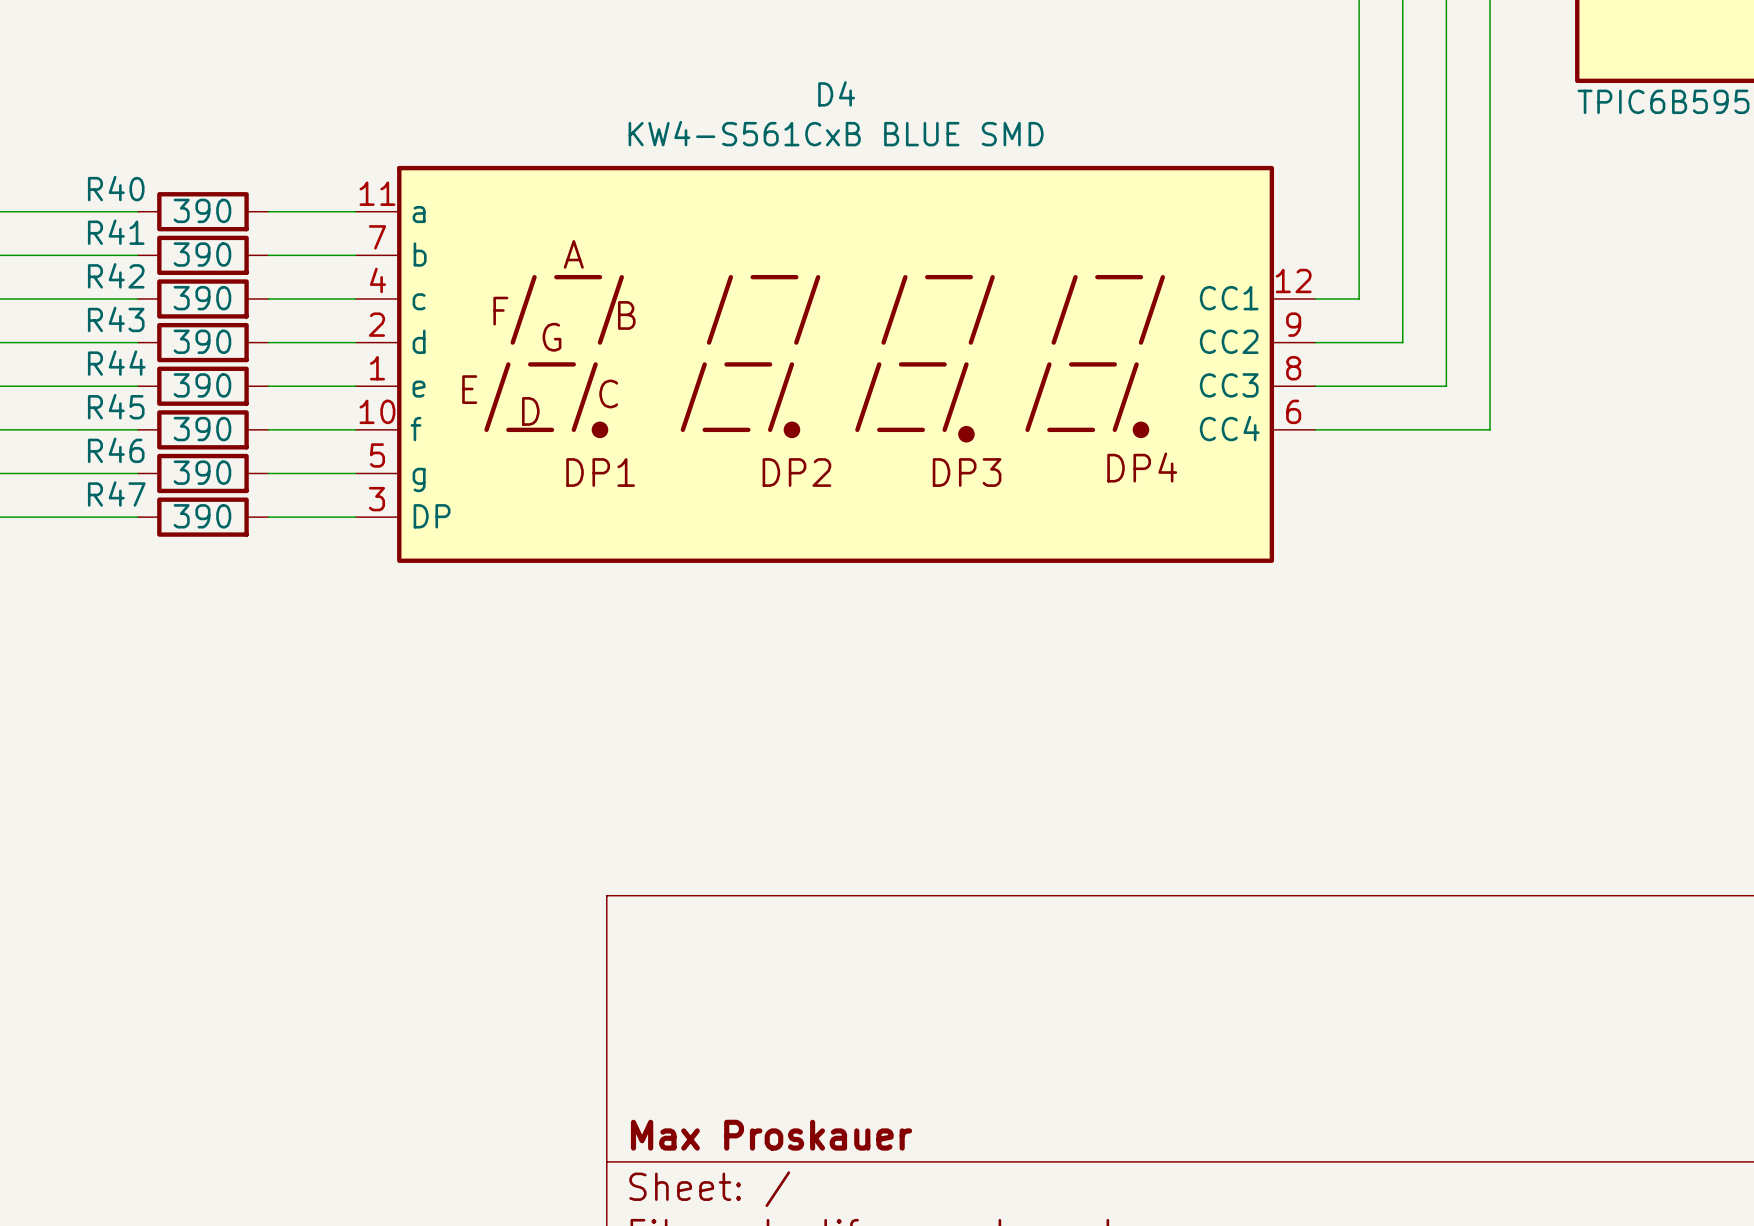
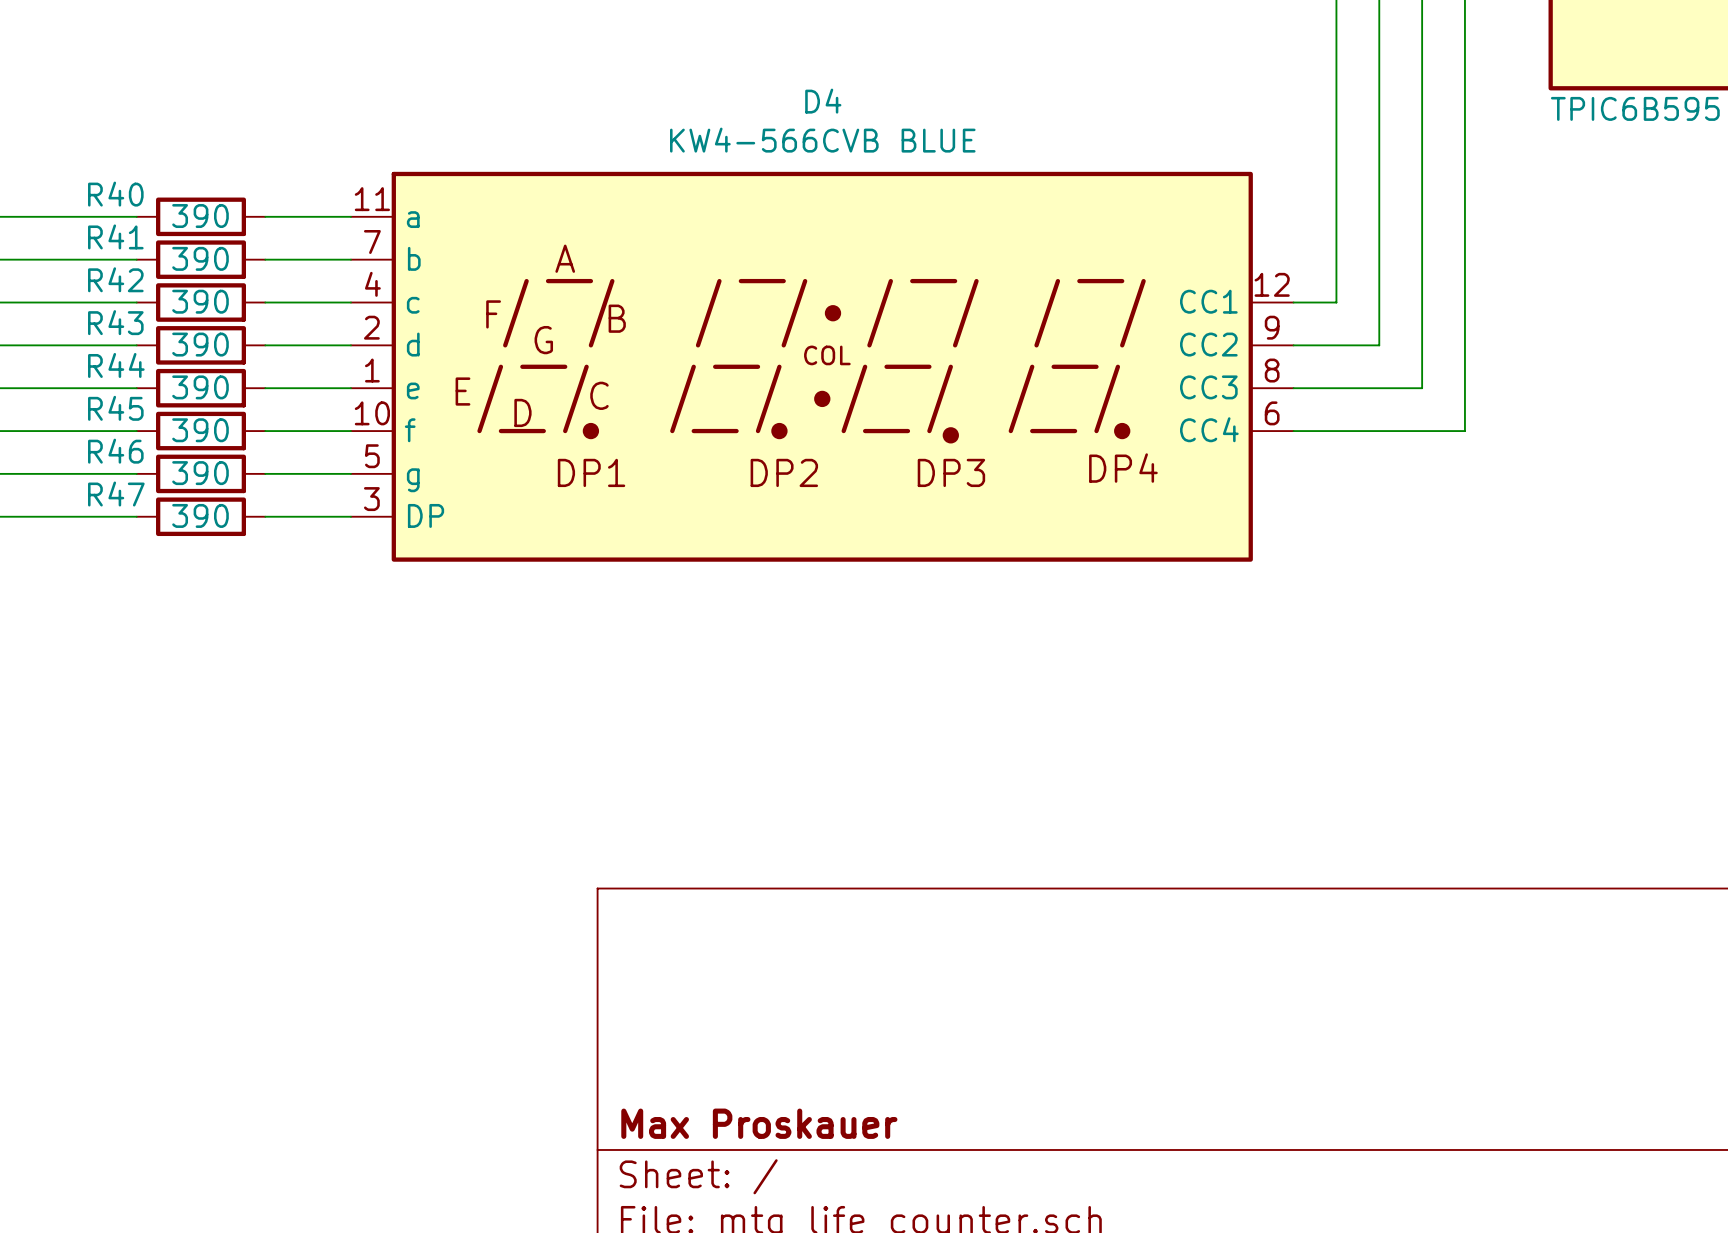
D4 value: KW4-S561CxB BLUE SMD (836, 133) -> KW4-566CVB BLUE (822, 140)
D4 symbol: [355, 165, 1316, 563] -> [350, 171, 1294, 562]

